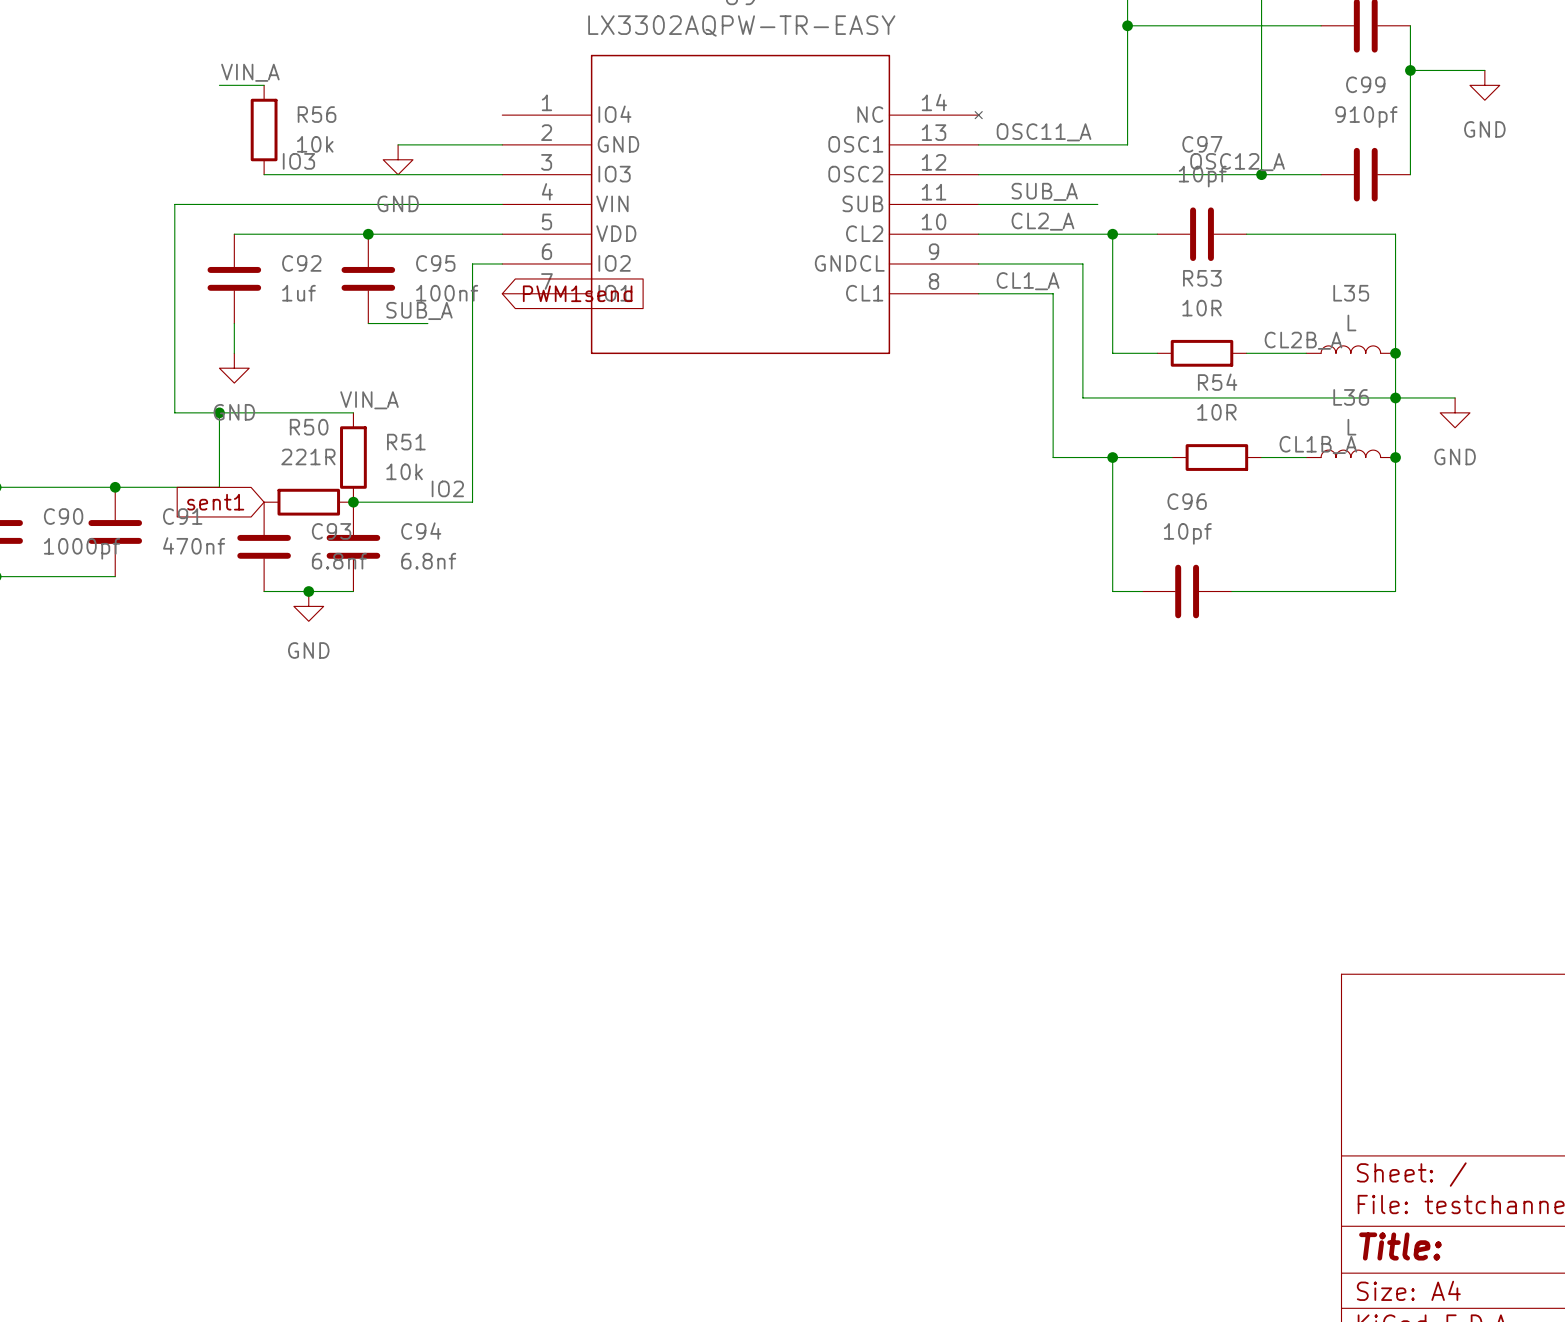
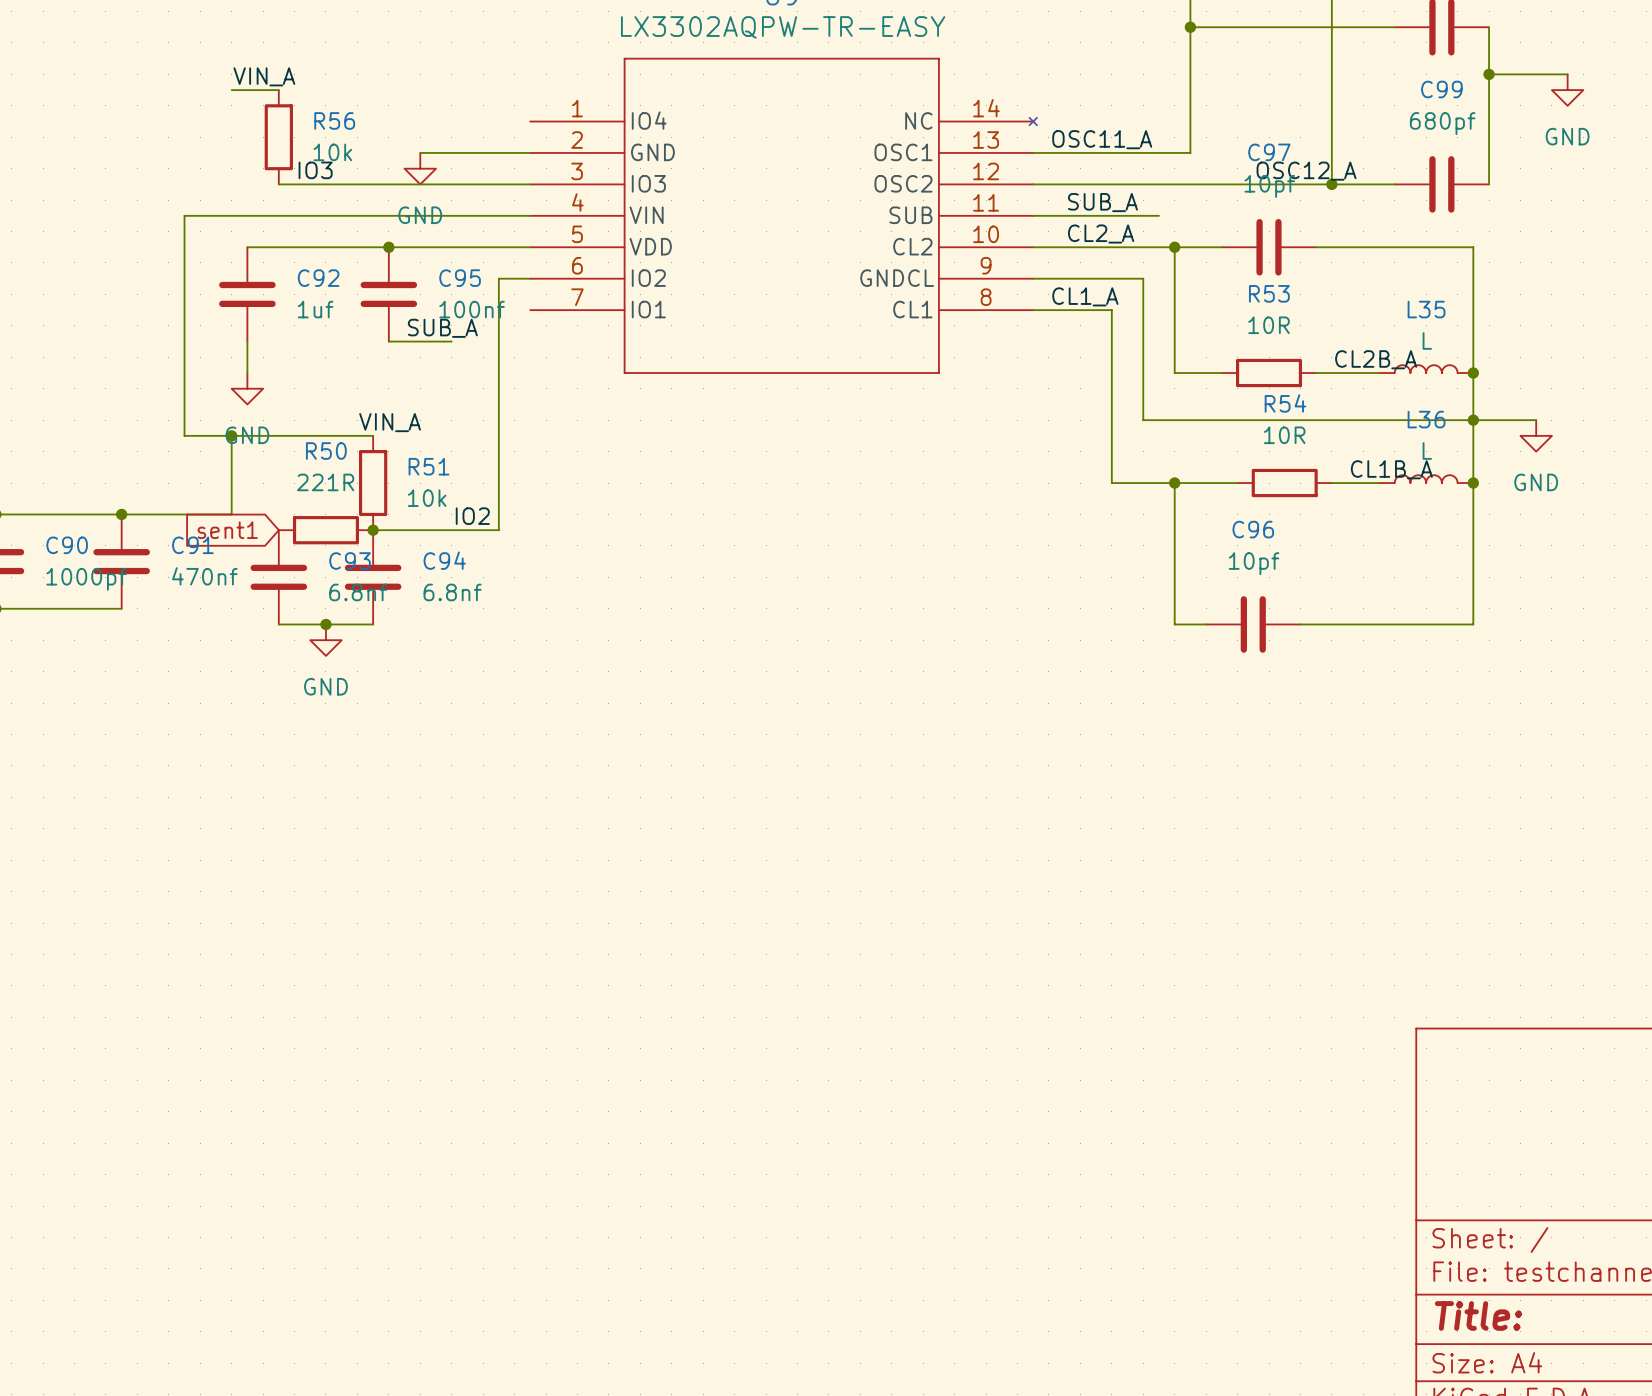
C99 value: 910pf (1366, 117) -> 680pf (1442, 123)
global label: PWM1send (577, 293) -> none

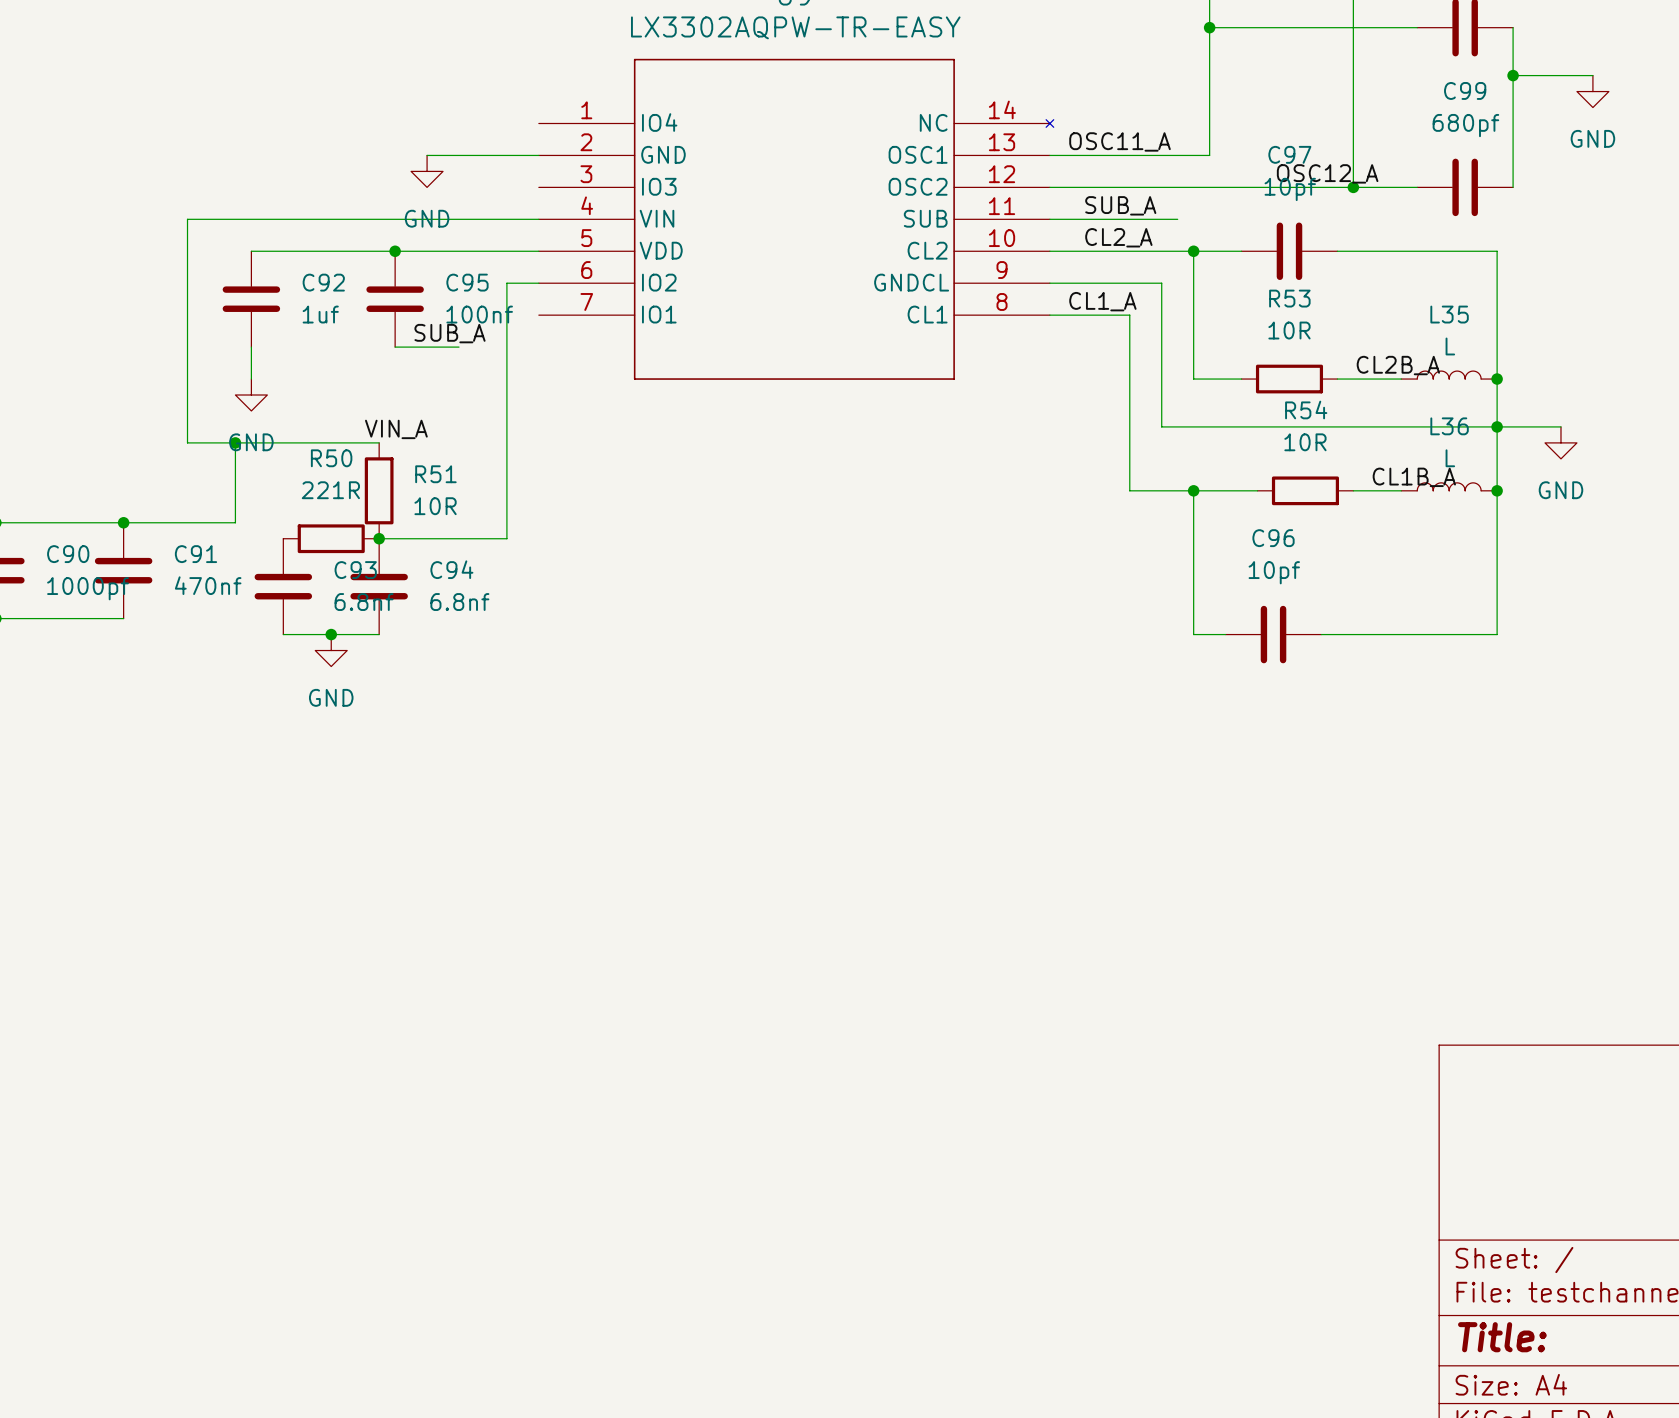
label: VIN_A (264, 76) -> none
wire: (231, 90) (278, 90) -> none
R56: 10k (278, 137) -> none
label: IO3 (315, 170) -> none
wire: (278, 184) (530, 184) -> none
R51 value: 10k (427, 498) -> 10R (435, 506)
label: IO2 (472, 516) -> none
global label: sent1 (227, 530) -> none

